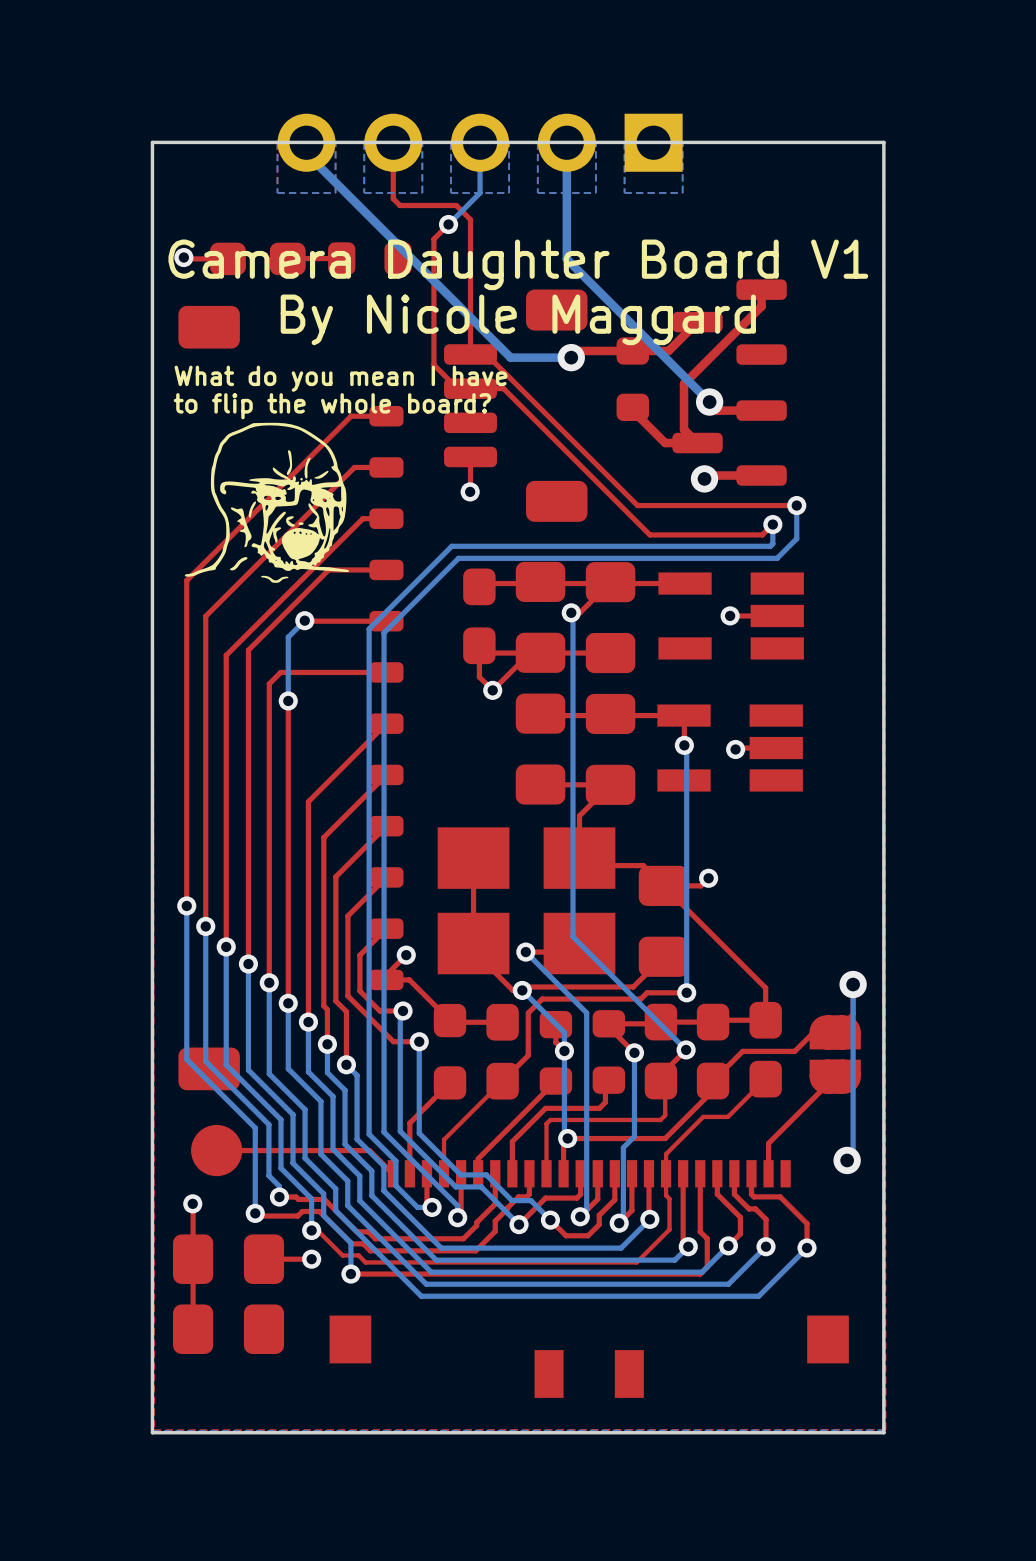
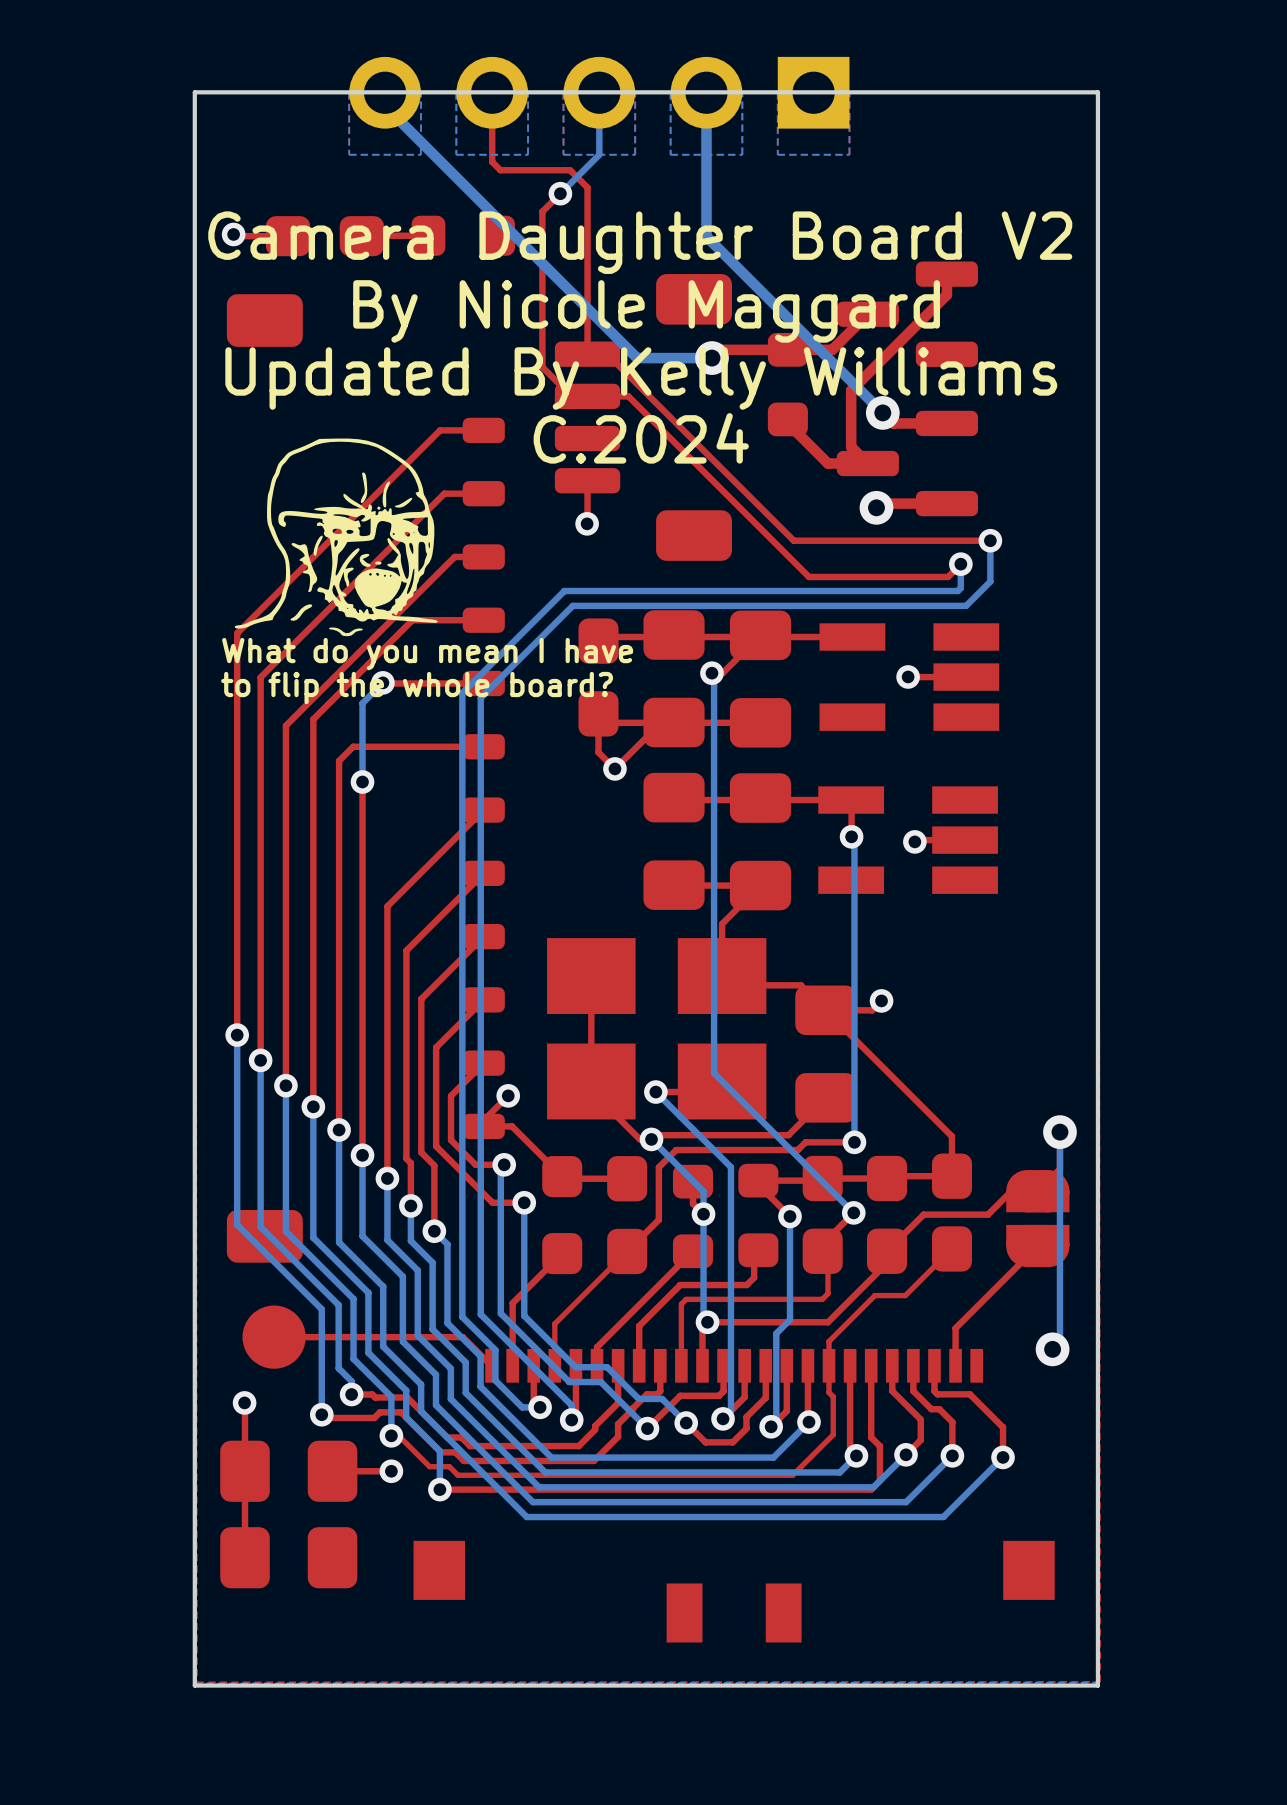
text: Camera Daughter Board V1 (518, 264) -> Camera Daughter Board V2 (640, 242)
text: none -> Updated By Kelly Williams (641, 378)
text position: What do you mean I have (340, 378) -> What do you mean I have (427, 654)
text position: to flip the whole board? (332, 406) -> to flip the whole board? (417, 688)
text: none -> C.2024 (641, 438)

